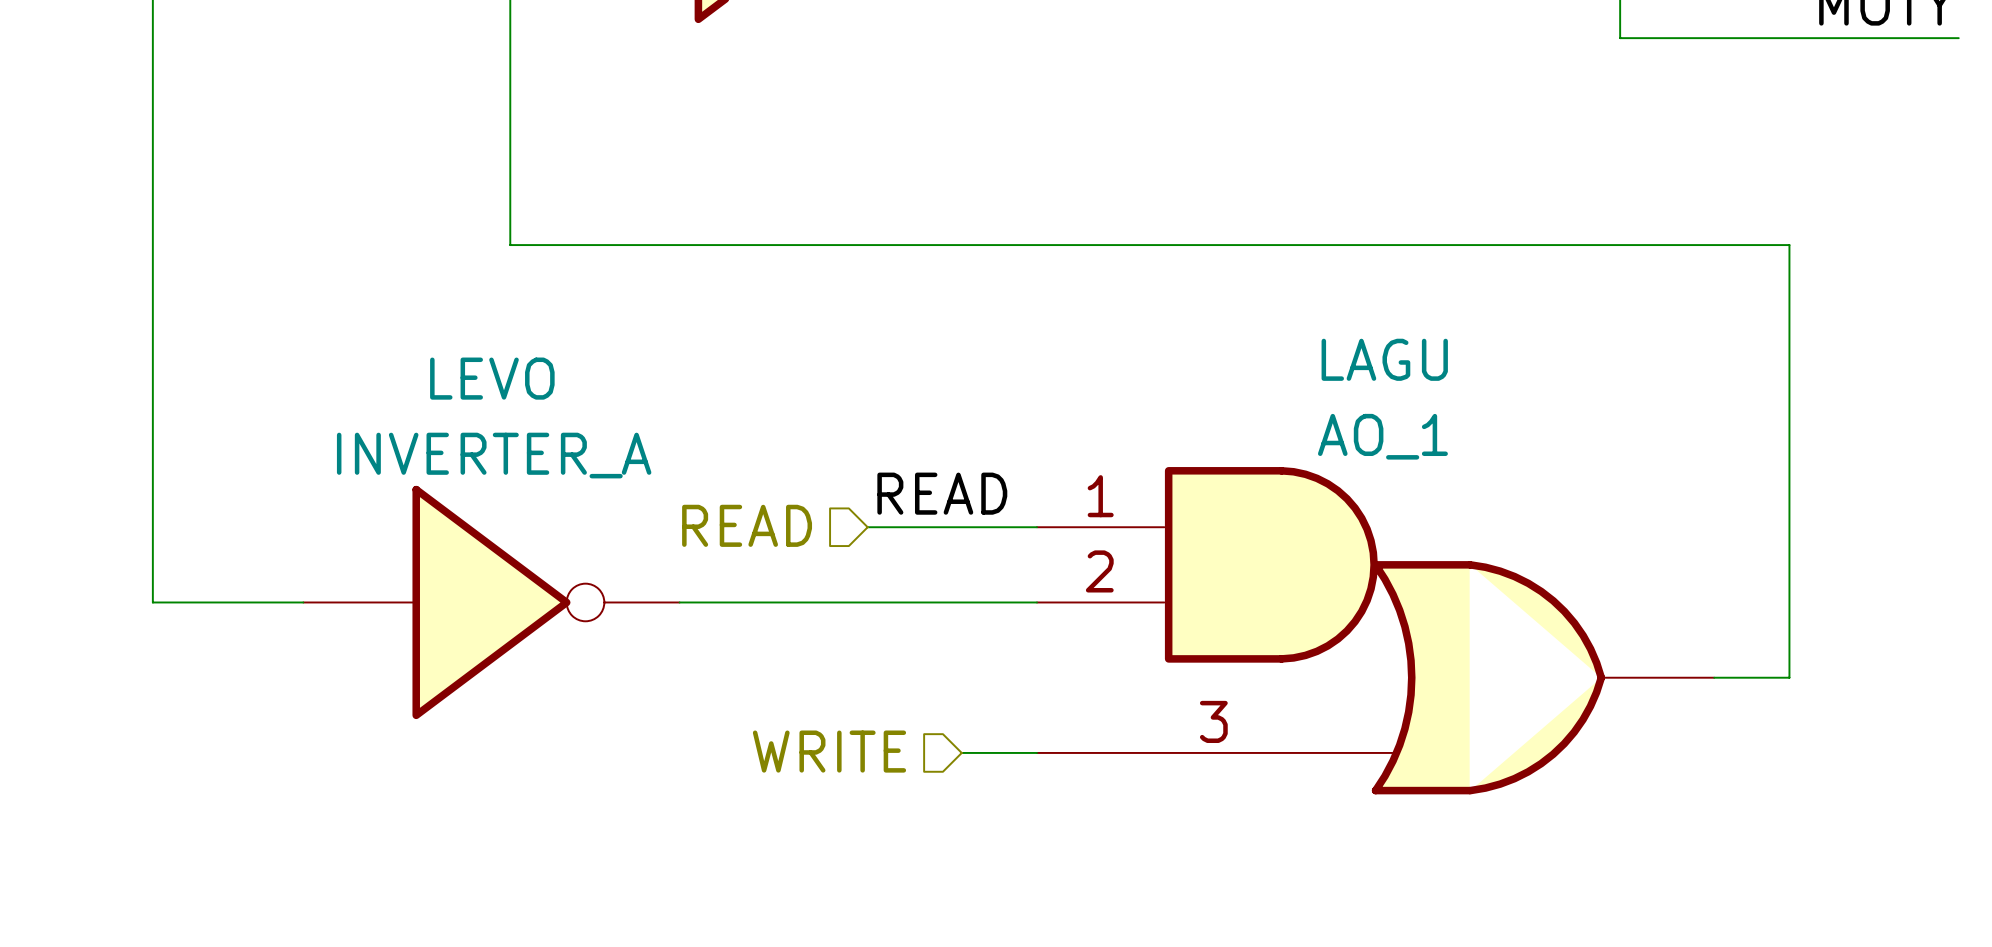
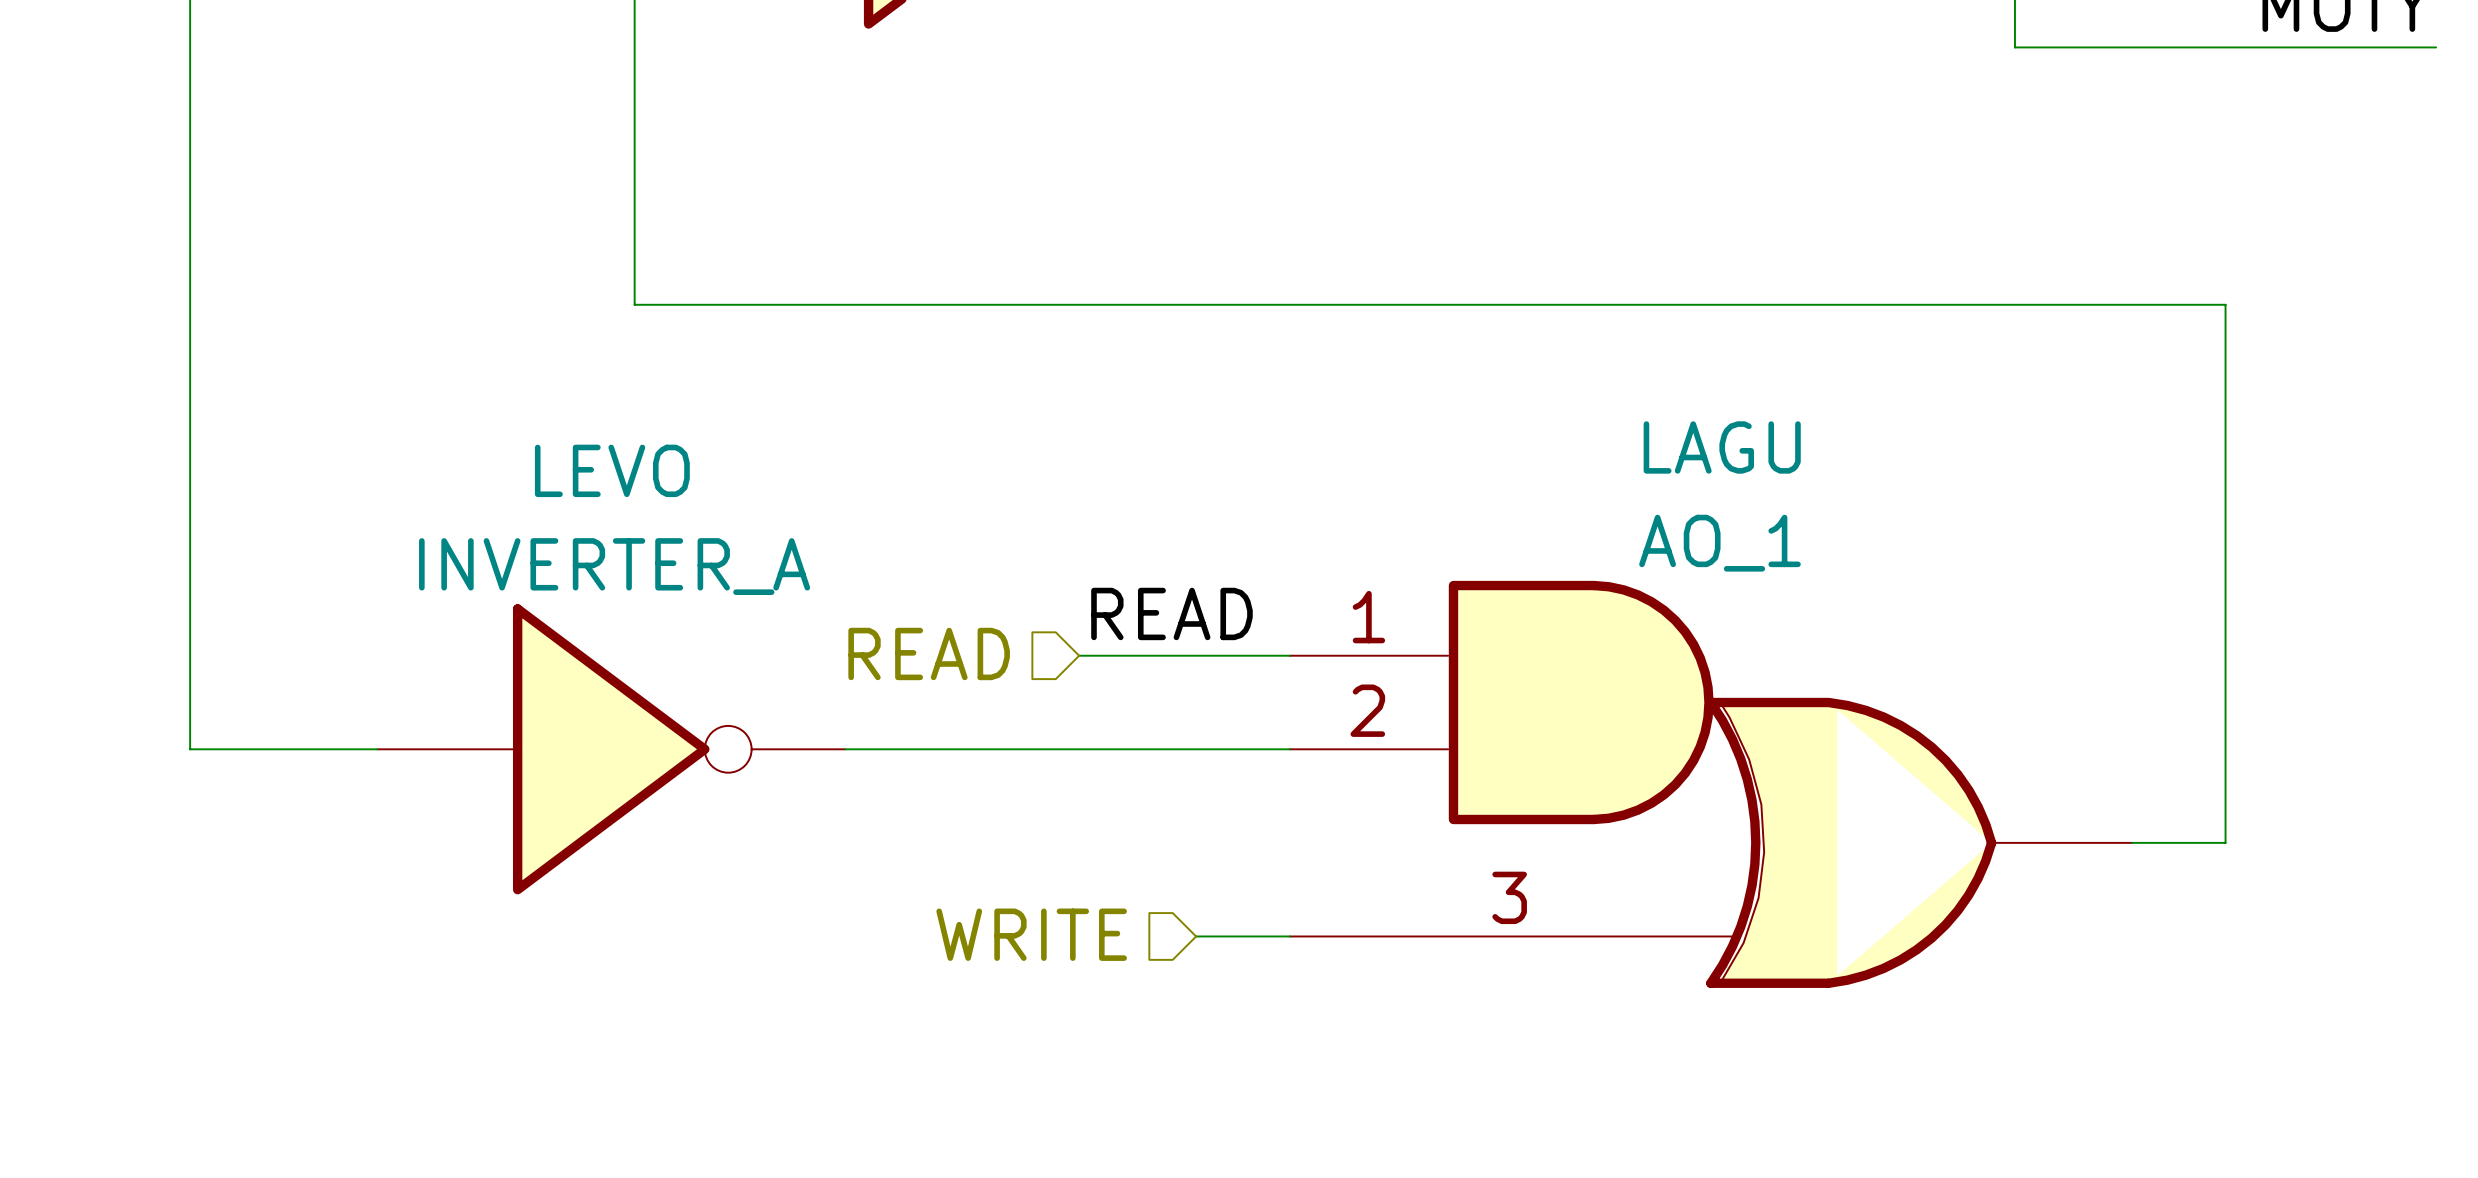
LAGU symbol: [1036, 467, 1715, 795] -> [1289, 580, 2132, 988]

